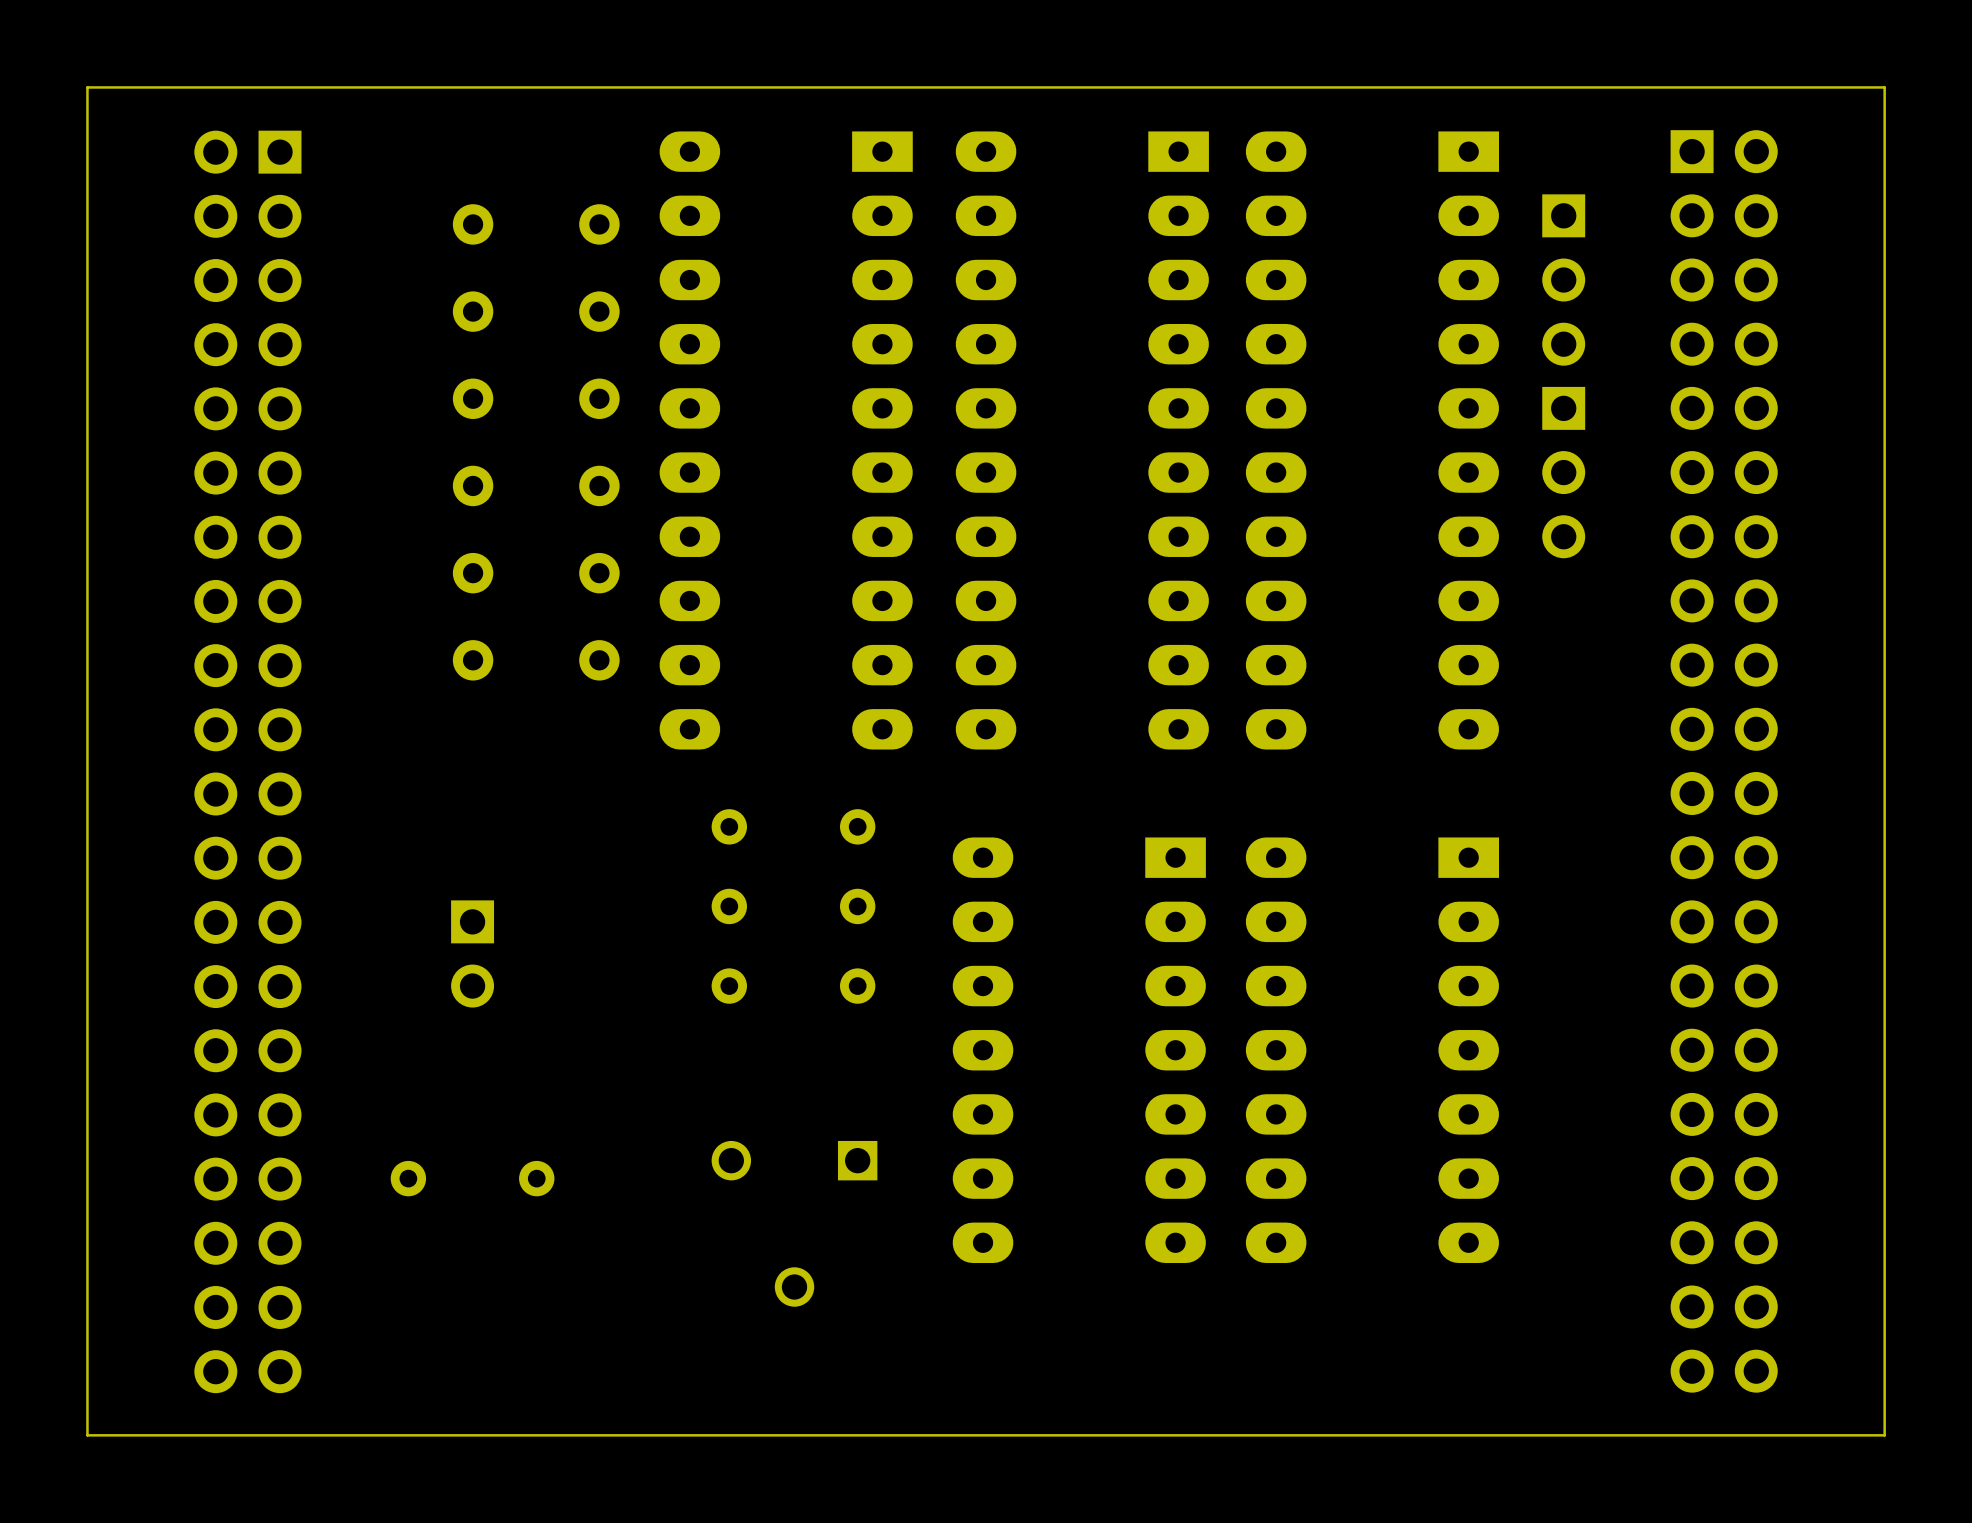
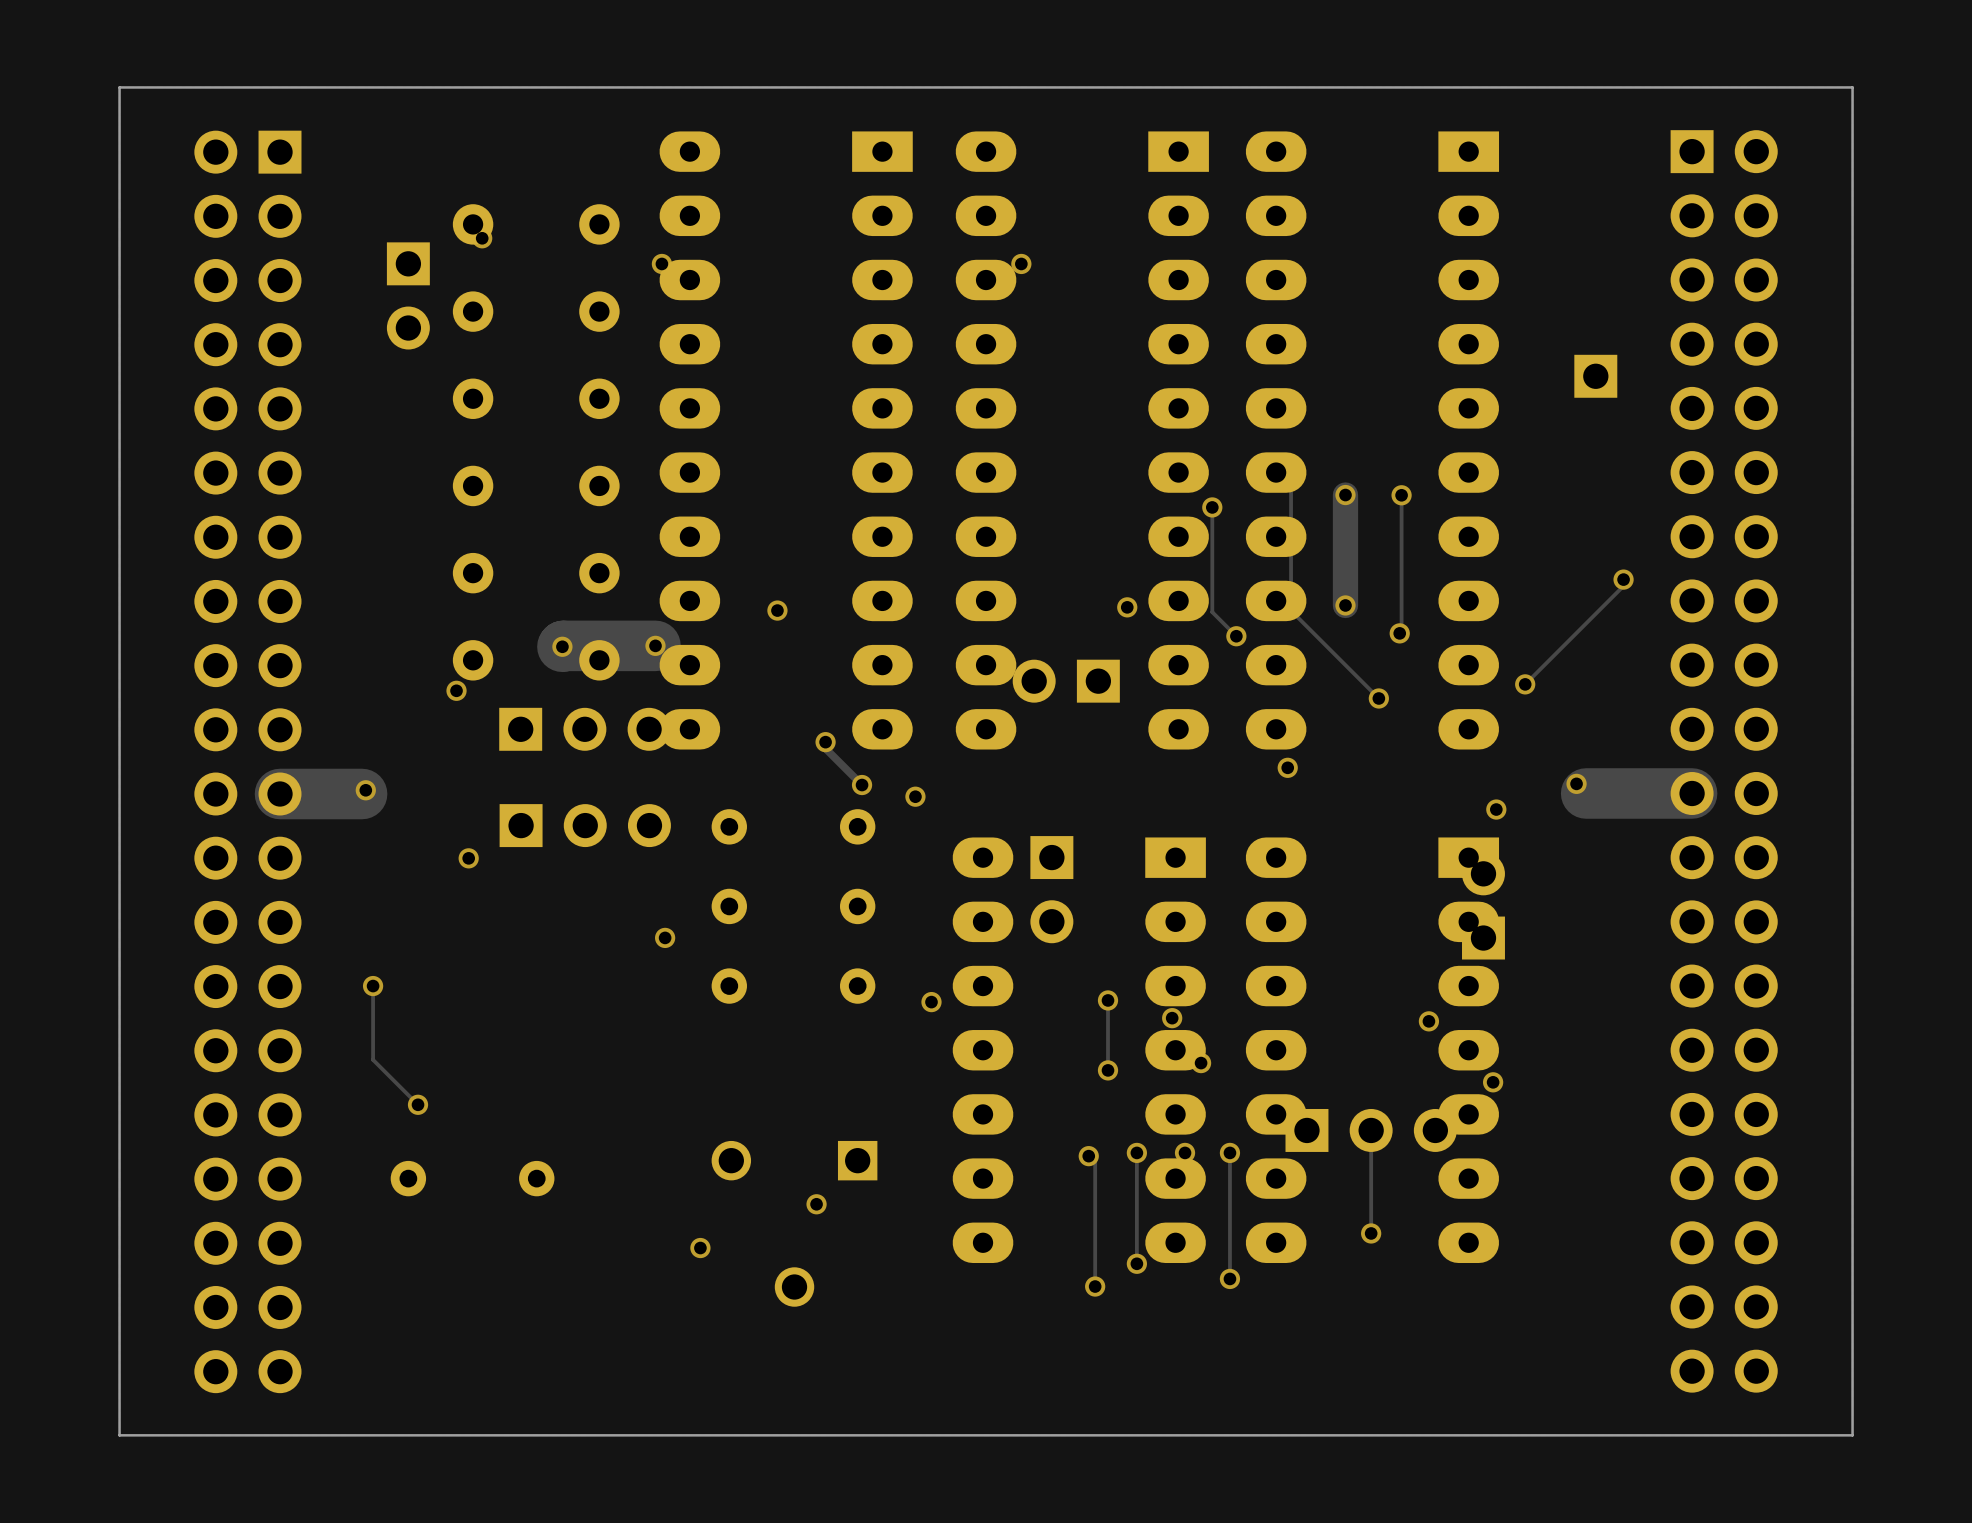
board edge: (119, 87) (87, 87) (87, 1435) (119, 1435) -> (119, 87) (119, 1435)
board edge: (1852, 87) (1884, 87) (1884, 1435) (1852, 1435) -> (1852, 87) (1852, 1435)
via: none -> (482, 238)
via: none -> (661, 263)
via: none -> (1021, 263)
part: (1563, 280) -> none
part: none -> (408, 295)
part: none -> (1595, 376)
track: none -> (1291, 472) (1291, 610) (1378, 698)
part: (1563, 472) -> none
track: none -> (1345, 495) (1345, 605)
via: none -> (1345, 495)
track: none -> (1401, 495) (1401, 631) (1399, 633)
via: none -> (1401, 495)
track: none -> (1212, 507) (1212, 612) (1236, 636)
via: none -> (1212, 507)
track: none -> (1623, 579) (1623, 586) (1525, 684)
via: none -> (1623, 579)
via: none -> (1345, 605)
via: none -> (1127, 607)
via: none -> (777, 610)
via: none -> (1399, 633)
via: none -> (1236, 636)
track: none -> (655, 645) (562, 646)
via: none -> (655, 645)
via: none -> (562, 646)
part: none -> (1066, 681)
via: none -> (1525, 684)
via: none -> (456, 690)
via: none -> (1378, 698)
part: none -> (584, 729)
track: none -> (825, 742) (825, 748) (862, 785)
via: none -> (825, 742)
via: none -> (1287, 767)
track: none -> (1576, 783) (1586, 793) (1692, 793)
via: none -> (1576, 783)
via: none -> (862, 785)
track: none -> (365, 790) (362, 794) (280, 794)
via: none -> (365, 790)
via: none -> (915, 796)
via: none -> (1496, 809)
part: none -> (585, 825)
via: none -> (468, 858)
part: none -> (1051, 889)
part: none -> (1483, 905)
via: none -> (665, 937)
part: (472, 953) -> none
track: none -> (373, 986) (373, 1059) (418, 1104)
via: none -> (373, 986)
track: none -> (1108, 1000) (1108, 1070)
via: none -> (1108, 1000)
via: none -> (931, 1002)
via: none -> (1172, 1018)
via: none -> (1428, 1021)
via: none -> (1201, 1063)
via: none -> (1108, 1070)
via: none -> (1493, 1082)
via: none -> (418, 1104)
track: none -> (1371, 1130) (1371, 1233)
part: none -> (1371, 1130)
track: none -> (1136, 1152) (1136, 1263)
via: none -> (1136, 1152)
via: none -> (1185, 1152)
track: none -> (1229, 1152) (1229, 1278)
via: none -> (1229, 1152)
track: none -> (1088, 1156) (1095, 1162) (1095, 1286)
via: none -> (1088, 1156)
via: none -> (816, 1204)
via: none -> (1371, 1233)
via: none -> (700, 1248)
via: none -> (1136, 1263)
via: none -> (1229, 1278)
via: none -> (1095, 1286)

